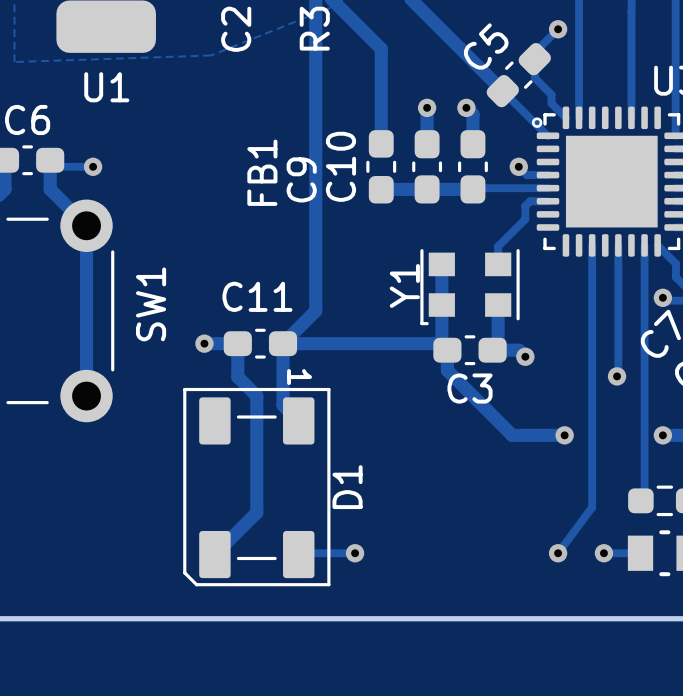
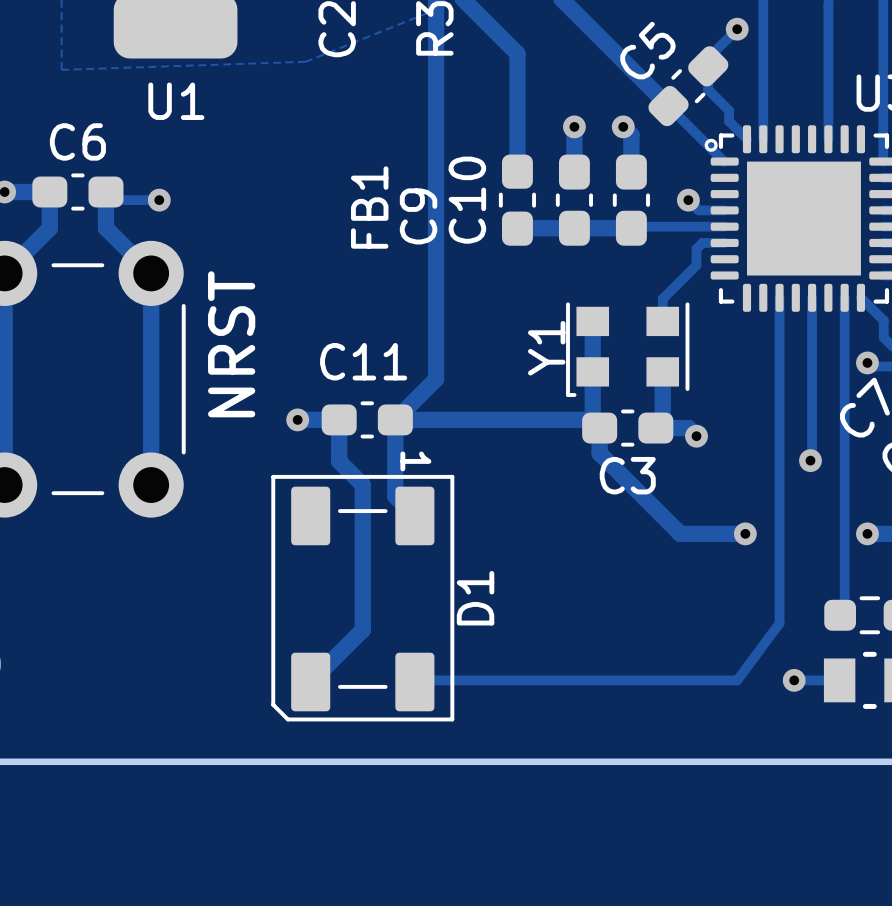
text: none -> NRST (231, 344)
SW1 name: SW1 (151, 304) -> none
track: none -> (484, 680) (737, 680)
via: (355, 553) -> none
via: (558, 553) -> none

